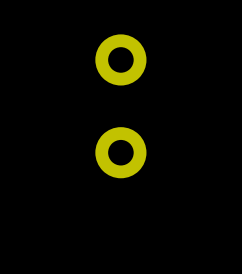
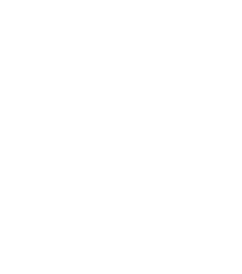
part: (120, 106) -> none

